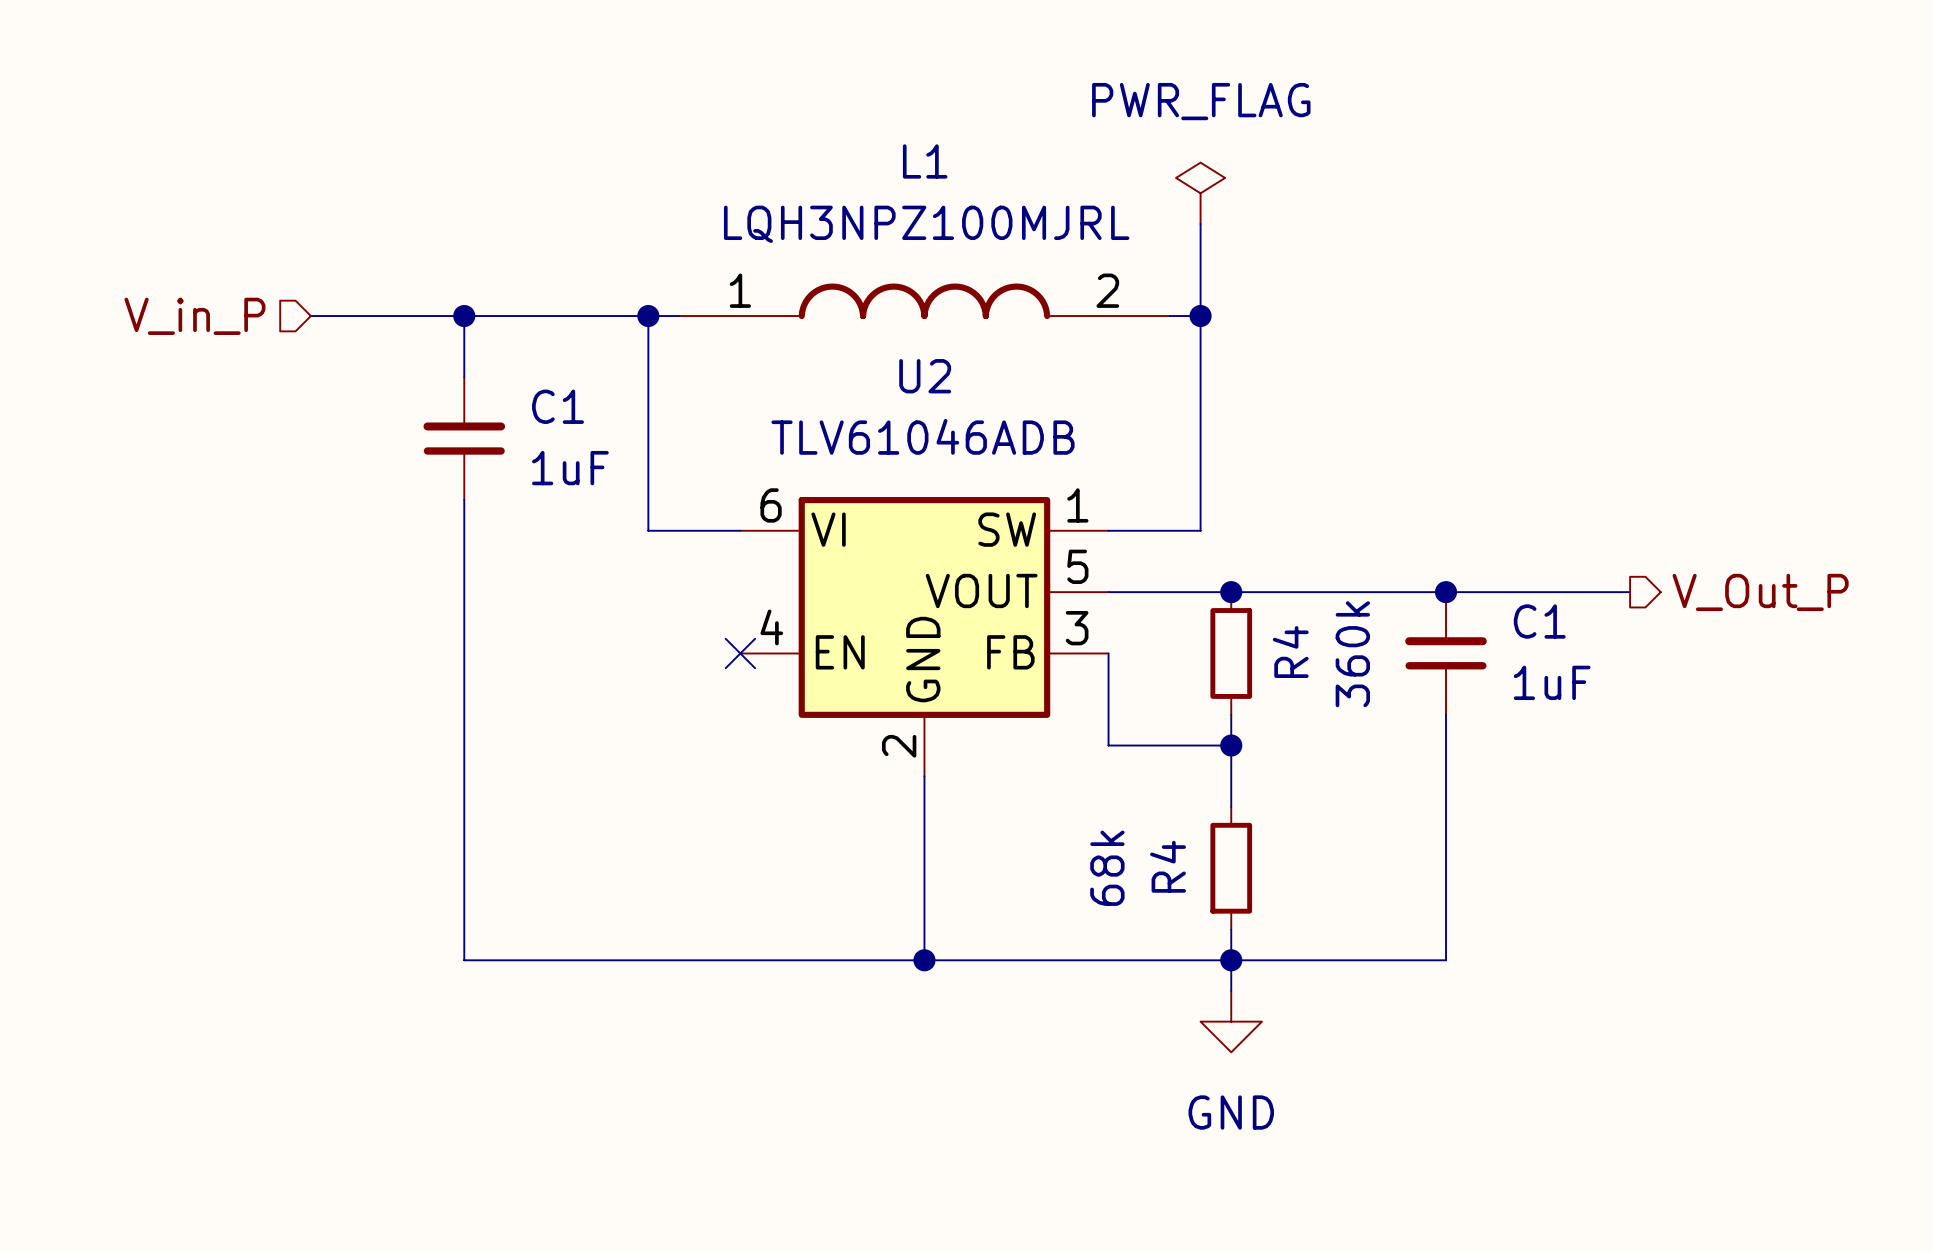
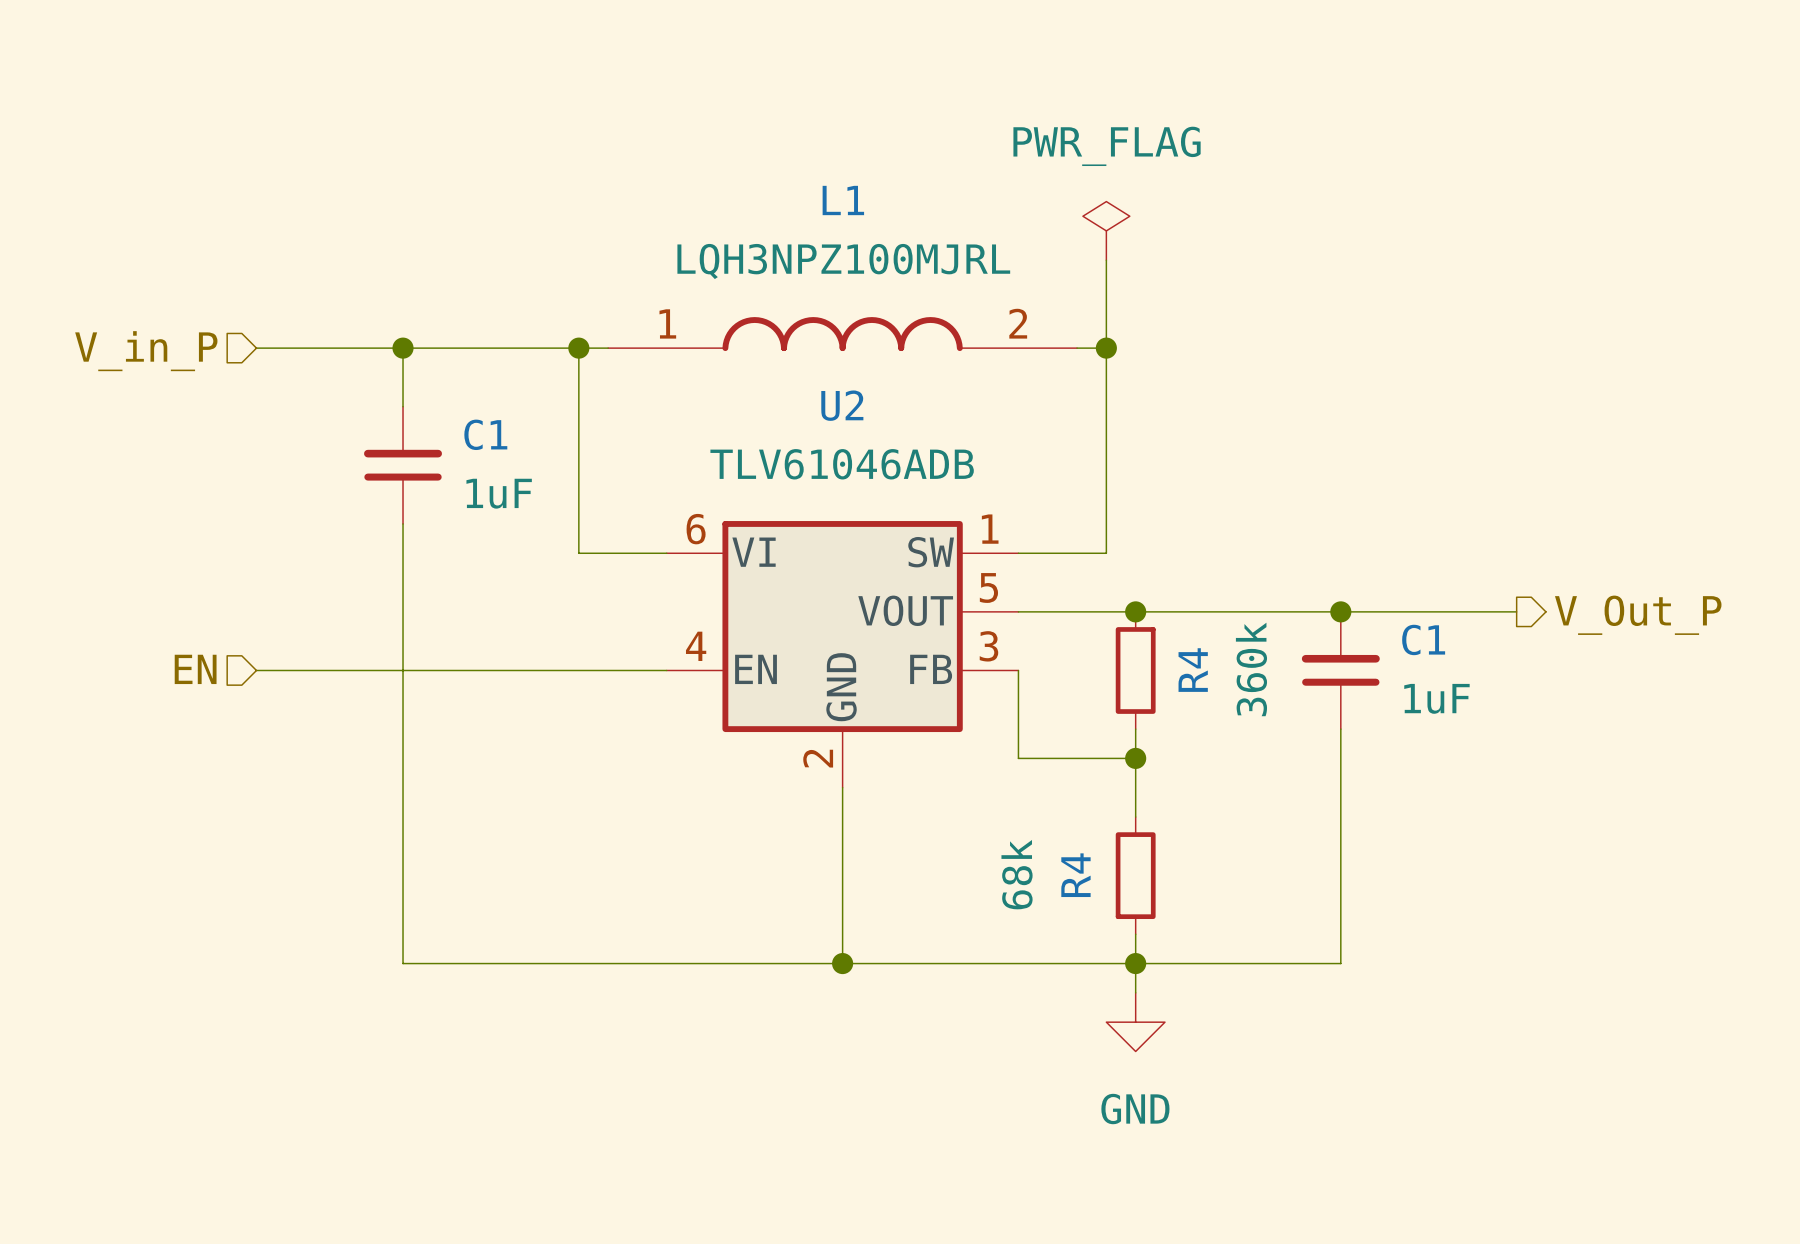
hierarchical label: none -> EN (195, 669)
wire: none -> (256, 670) (666, 670)
no-connect mark: (740, 653) -> none

